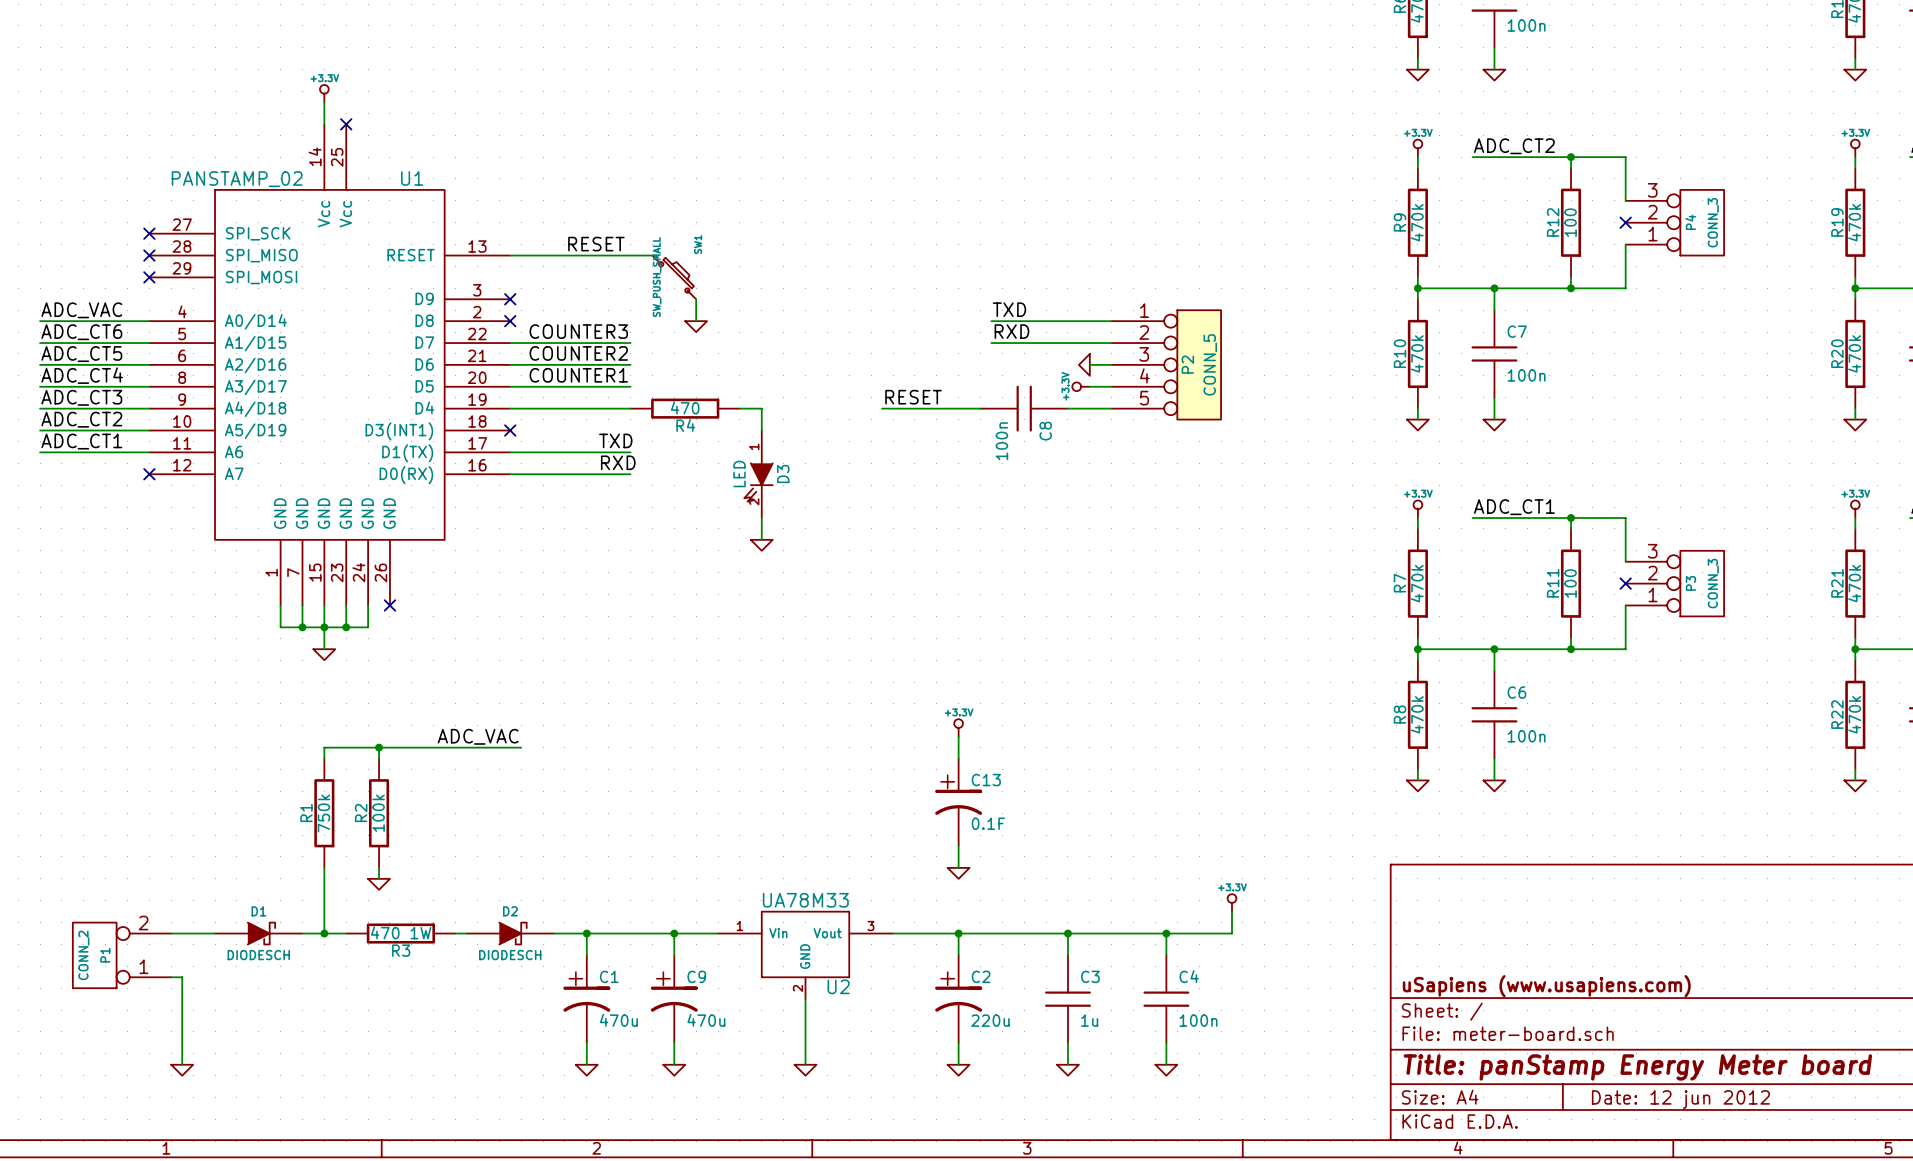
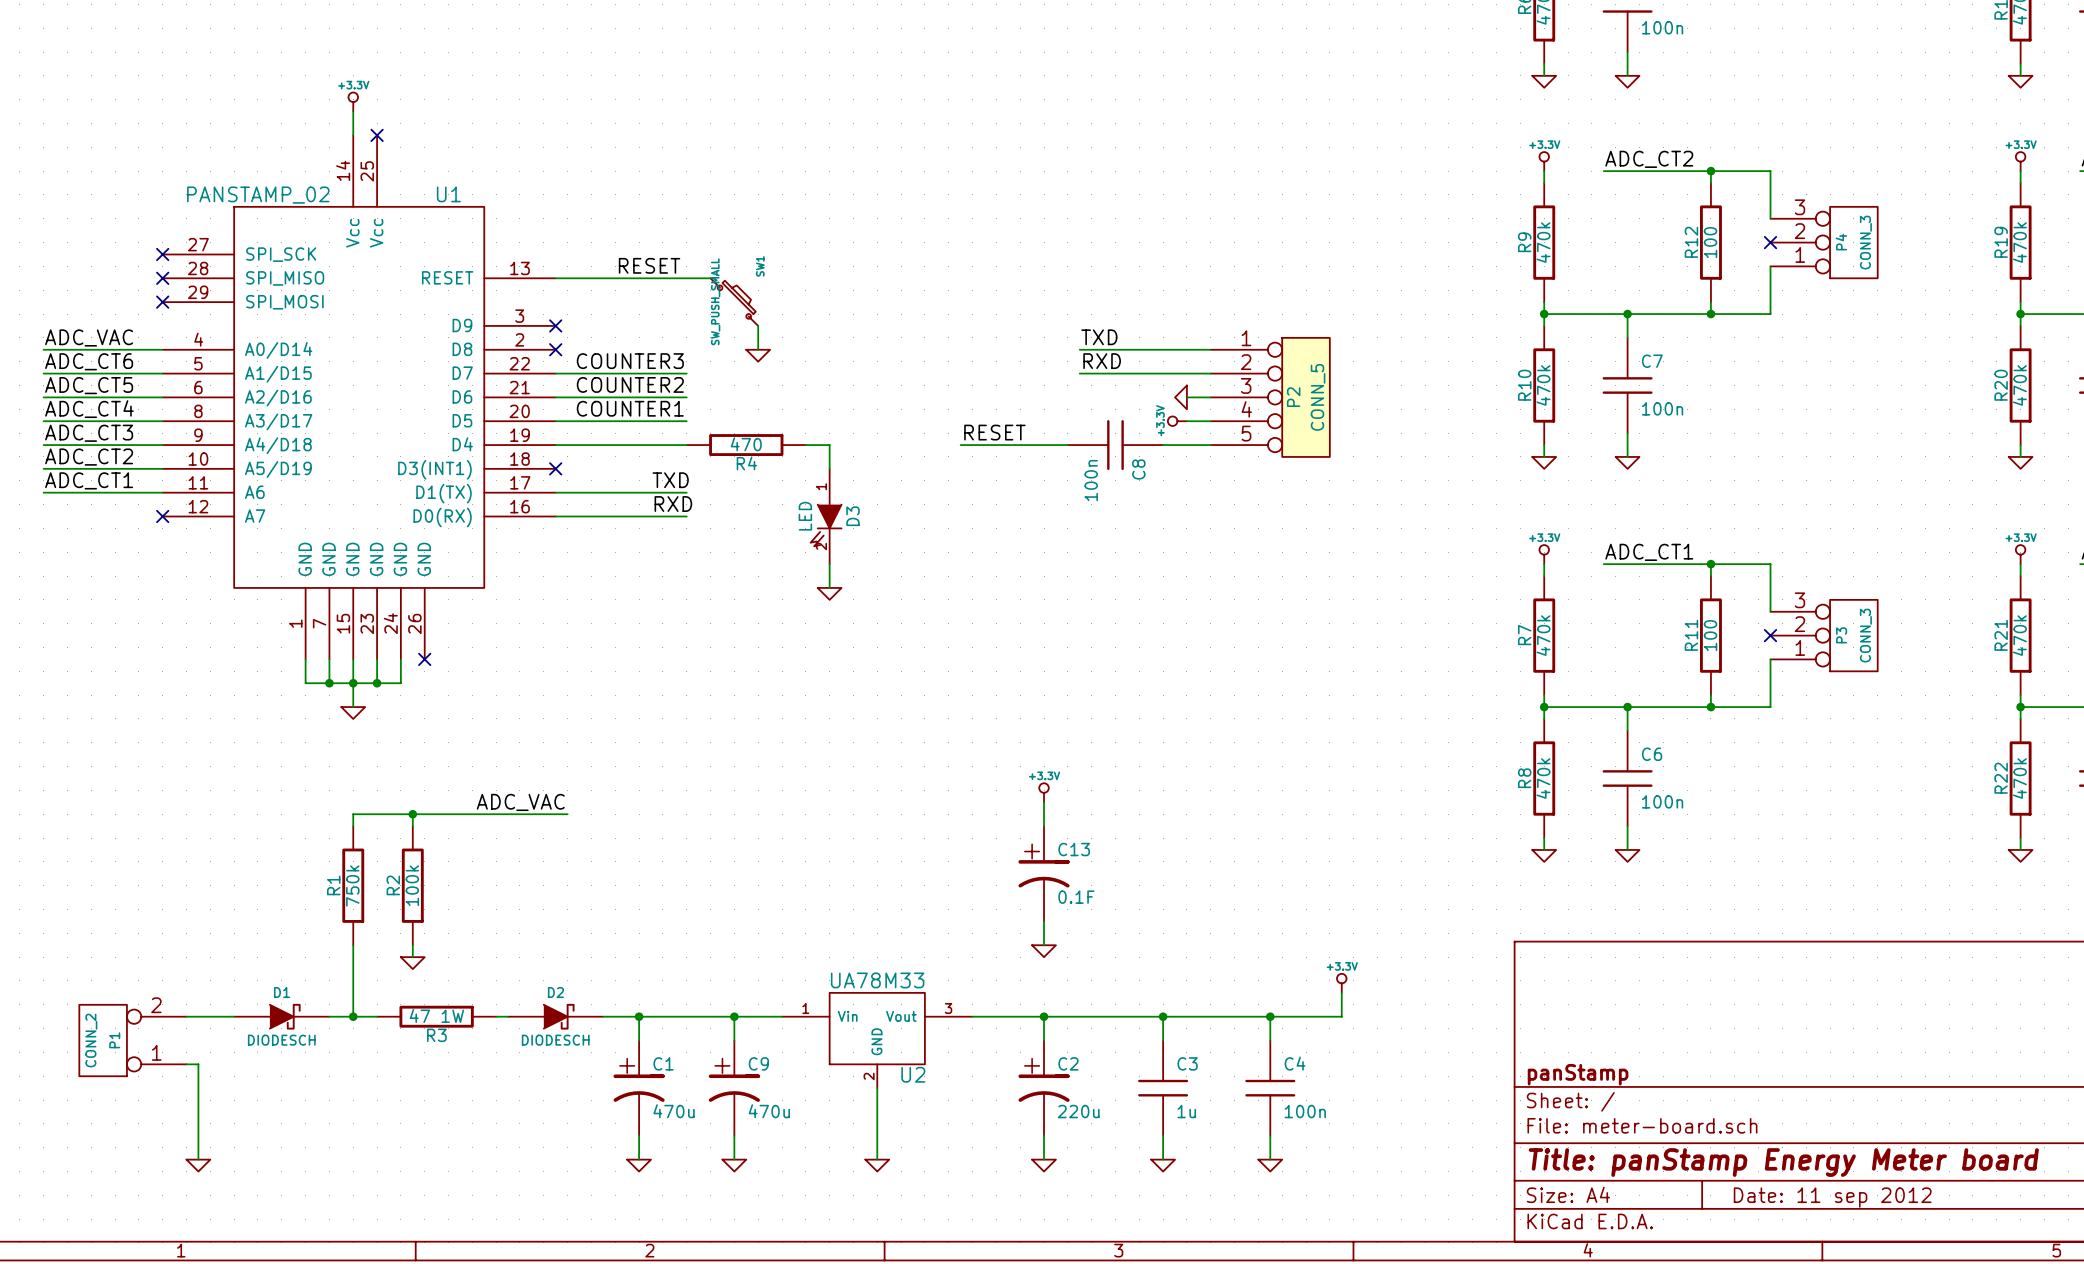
R3 value: 470 1W (401, 932) -> 47 1W (436, 1015)
title block: uSapiens (www.usapiens.com) (1546, 986) -> panStamp (1578, 1074)
title block: Date: 12 jun 2012 (1680, 1099) -> Date: 11 sep 2012 (1832, 1197)

